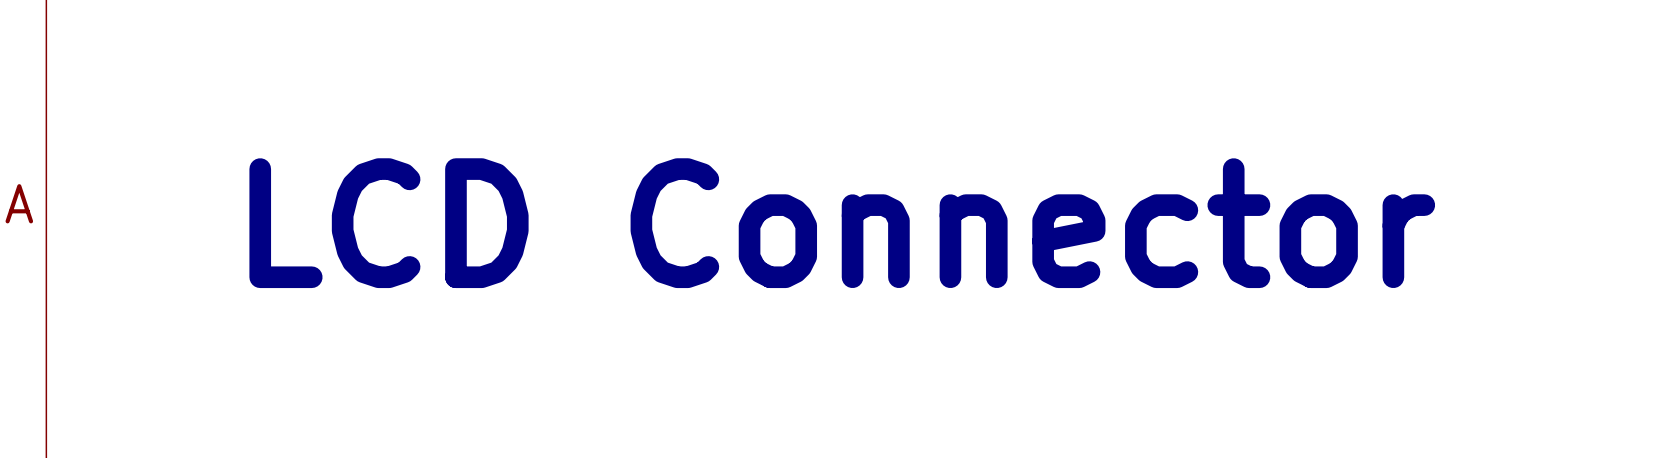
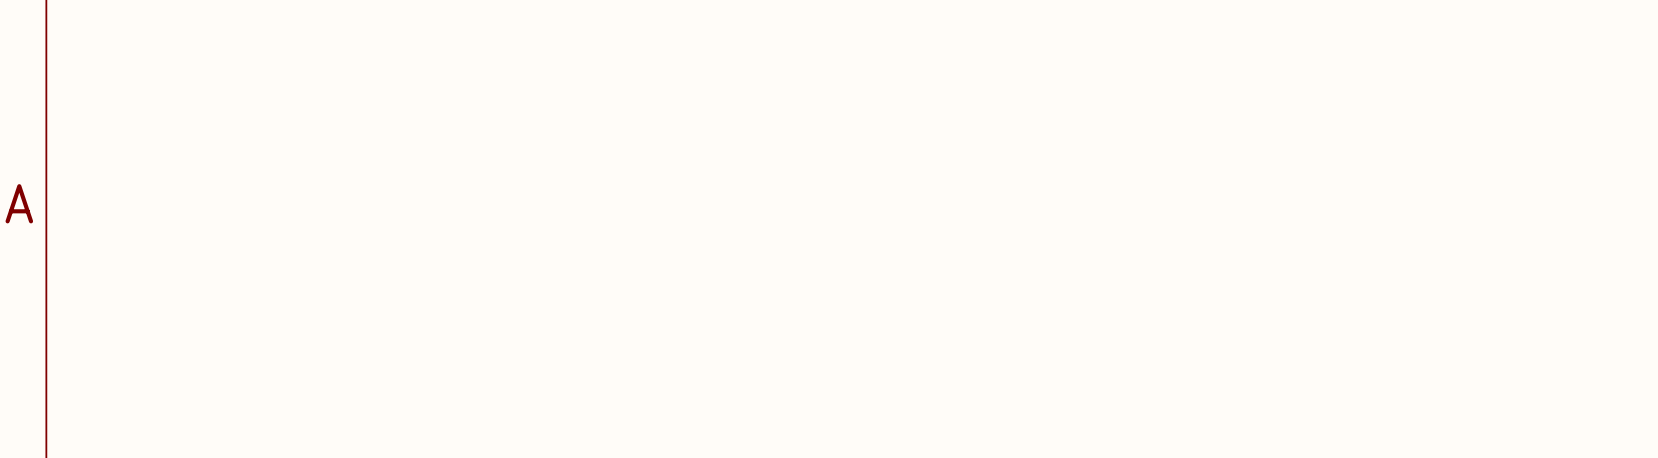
text: LCD Connector (842, 223) -> none

